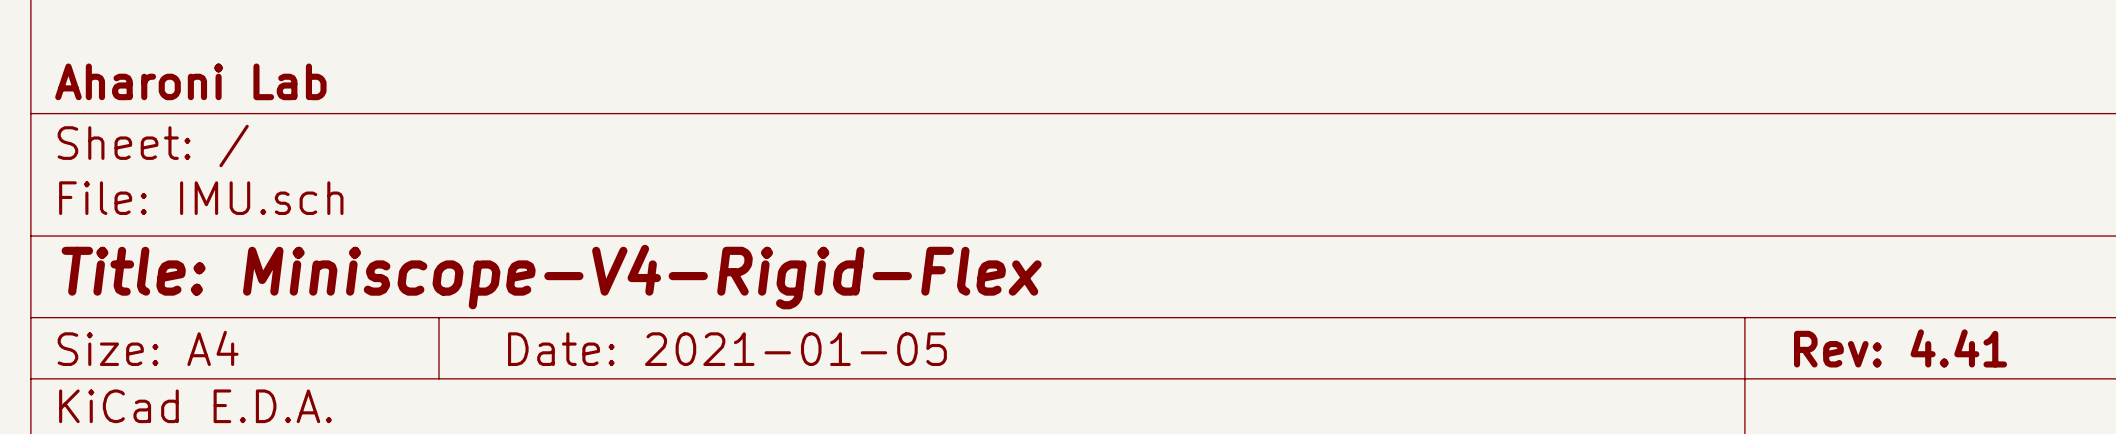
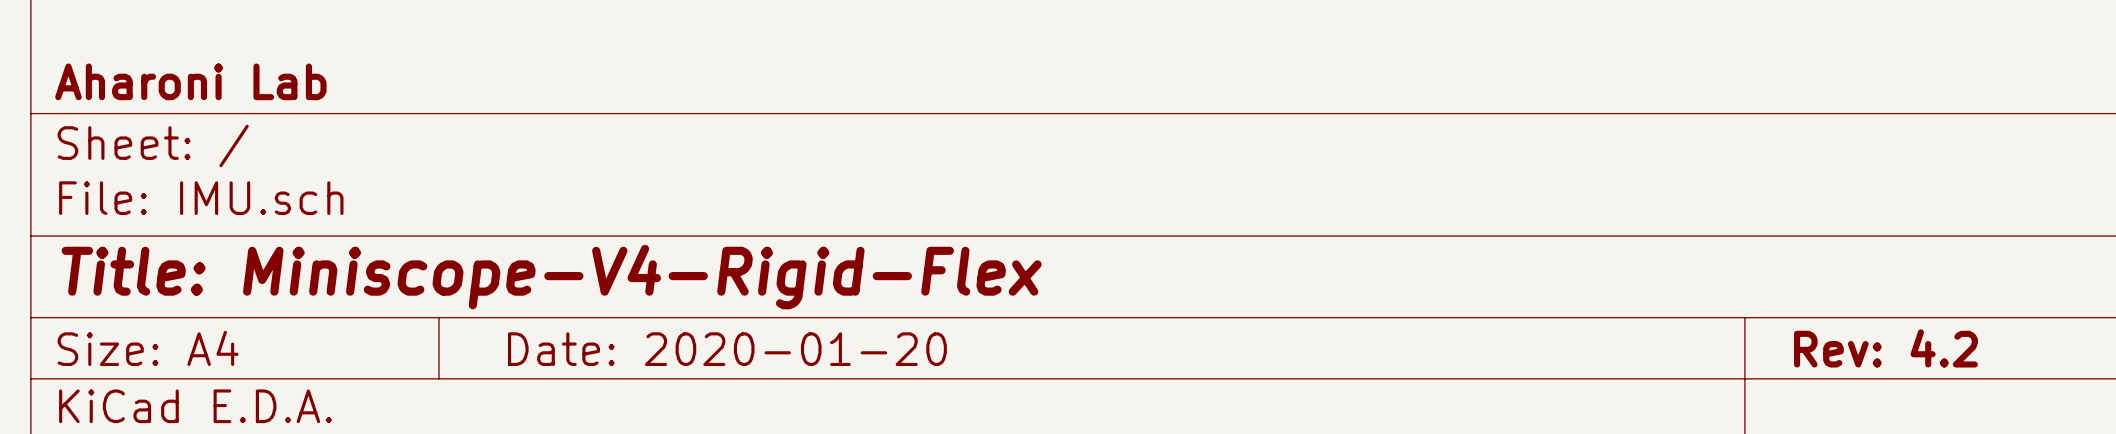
title block: Rev: 4.41 (1900, 348) -> Rev: 4.2 (1885, 348)
title block: Date: 2021-01-05 (727, 349) -> Date: 2020-01-20 (727, 349)

